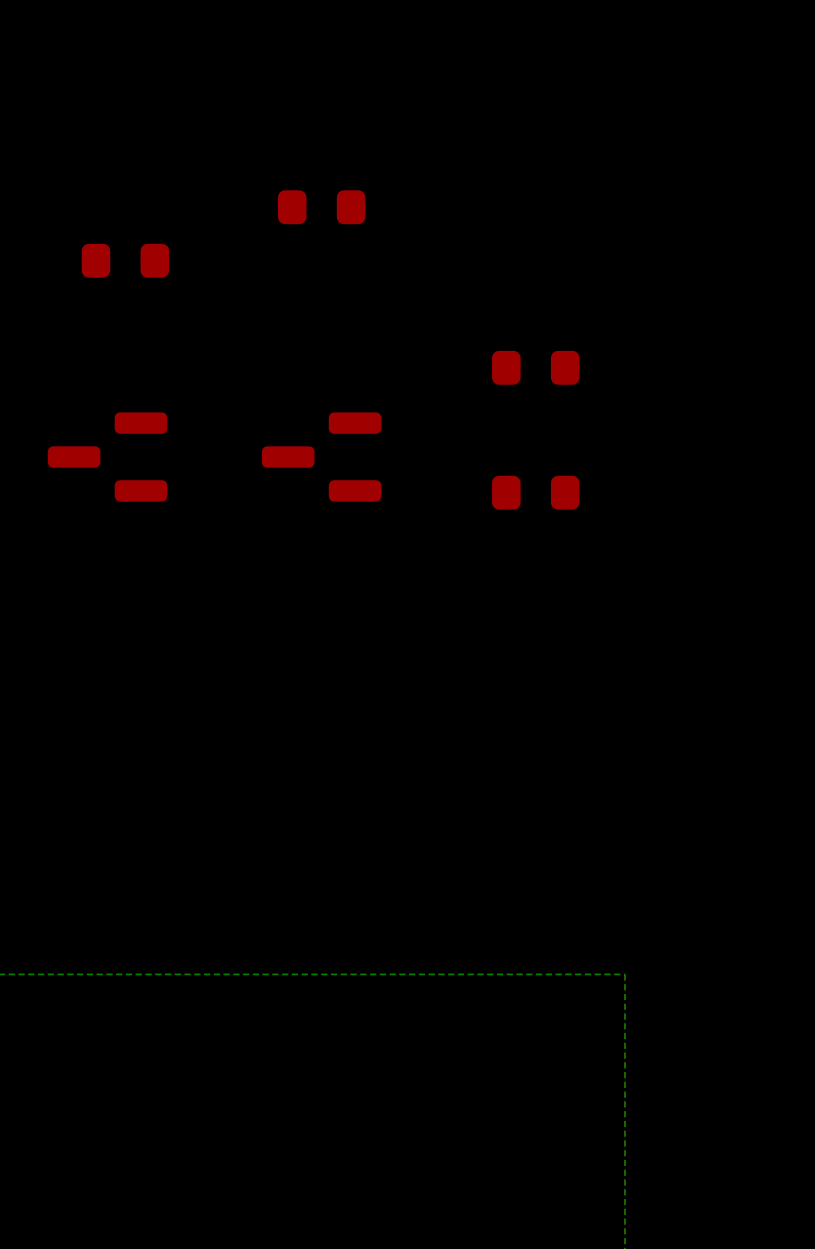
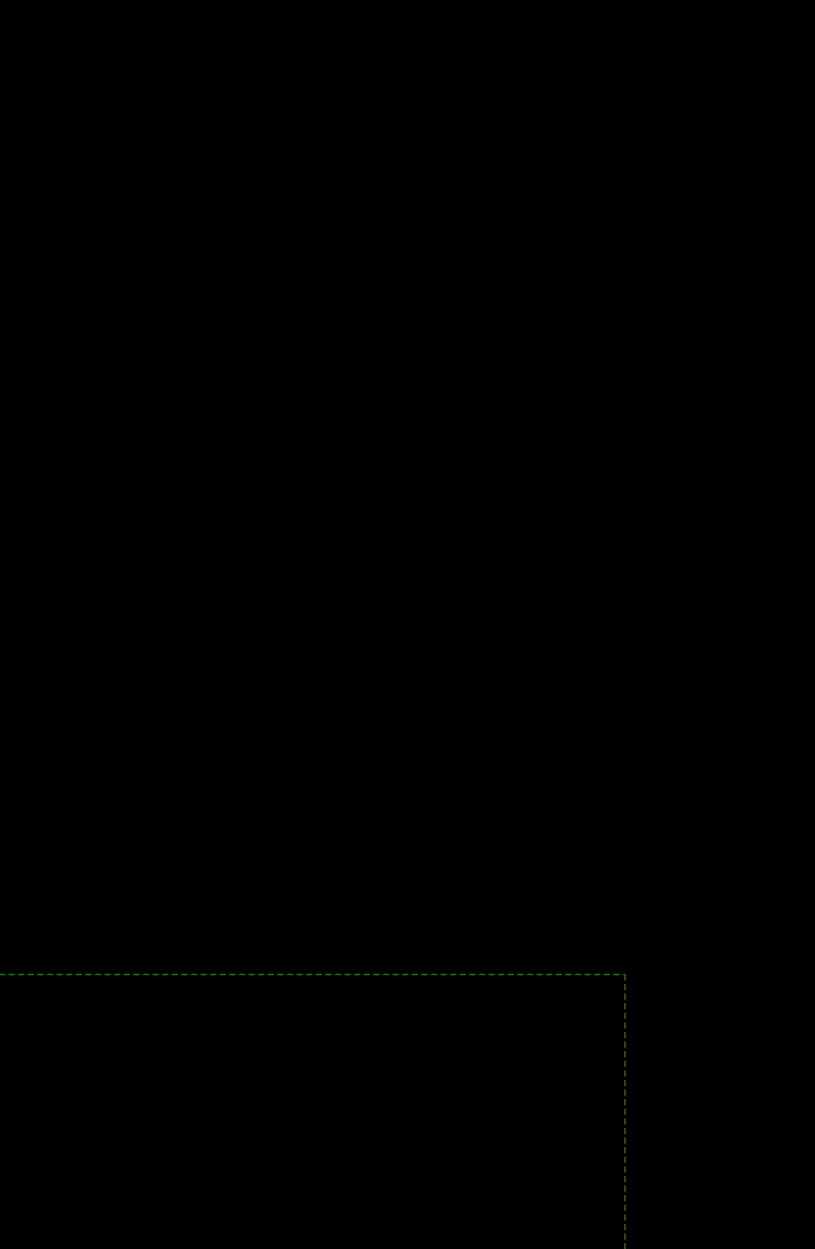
part: (321, 207) -> none
part: (125, 260) -> none
part: (535, 367) -> none
part: (107, 457) -> none
part: (321, 457) -> none
part: (535, 492) -> none

